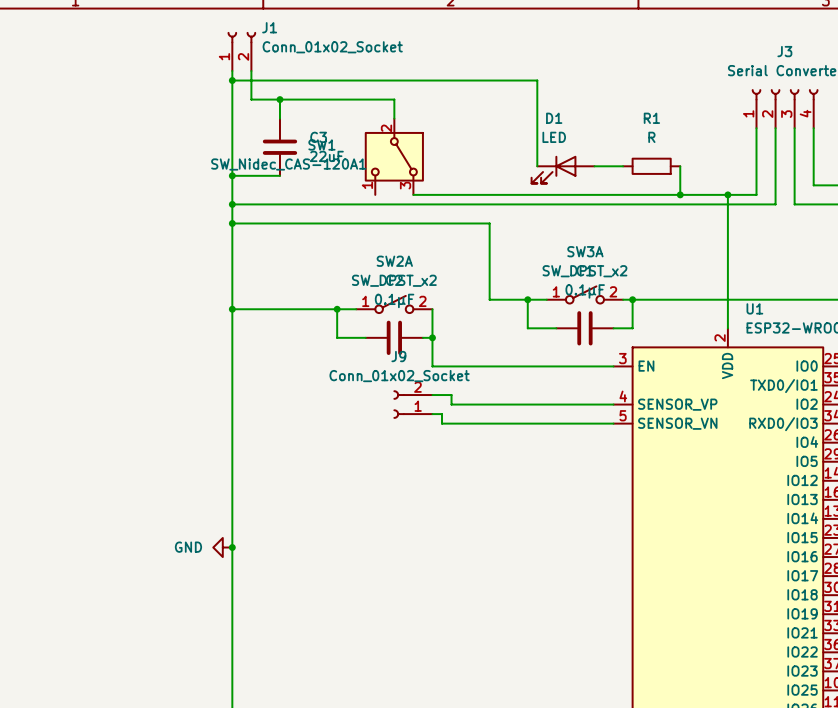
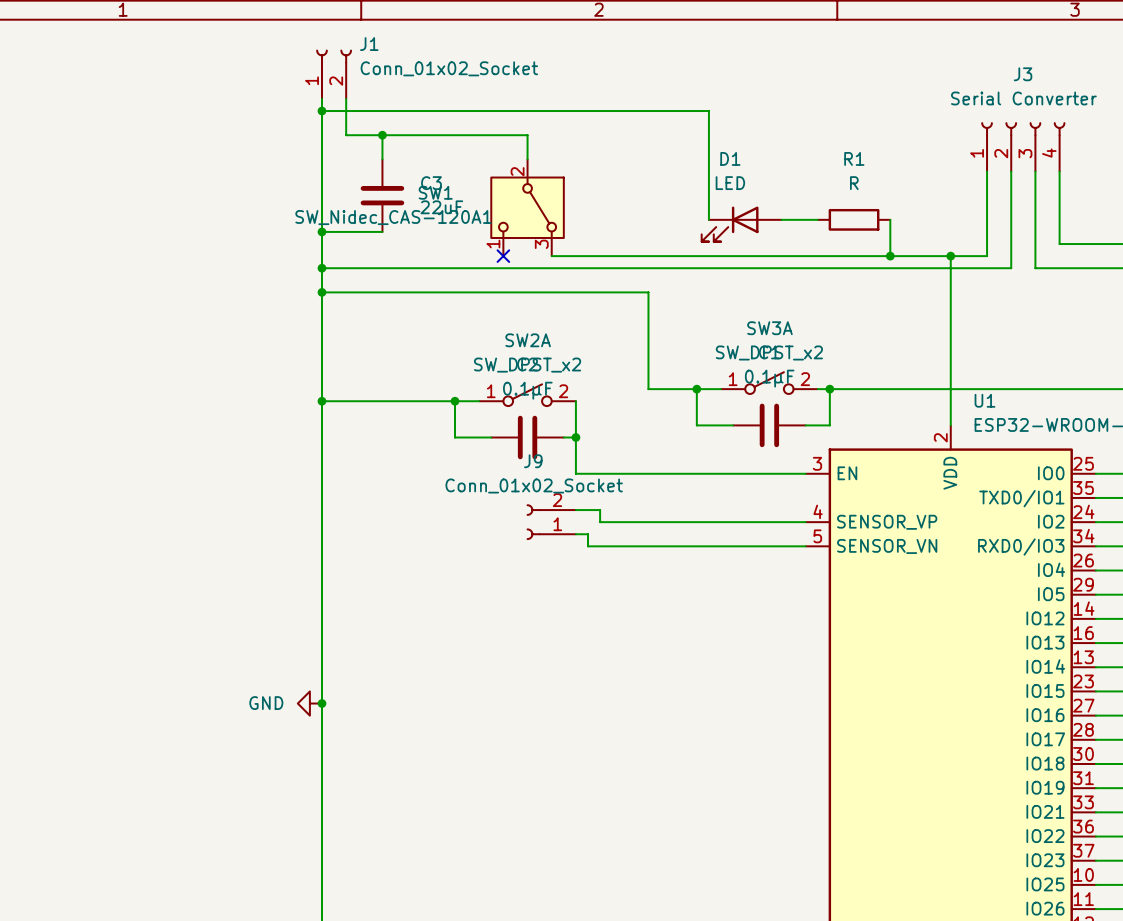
no-connect mark: none -> (503, 256)

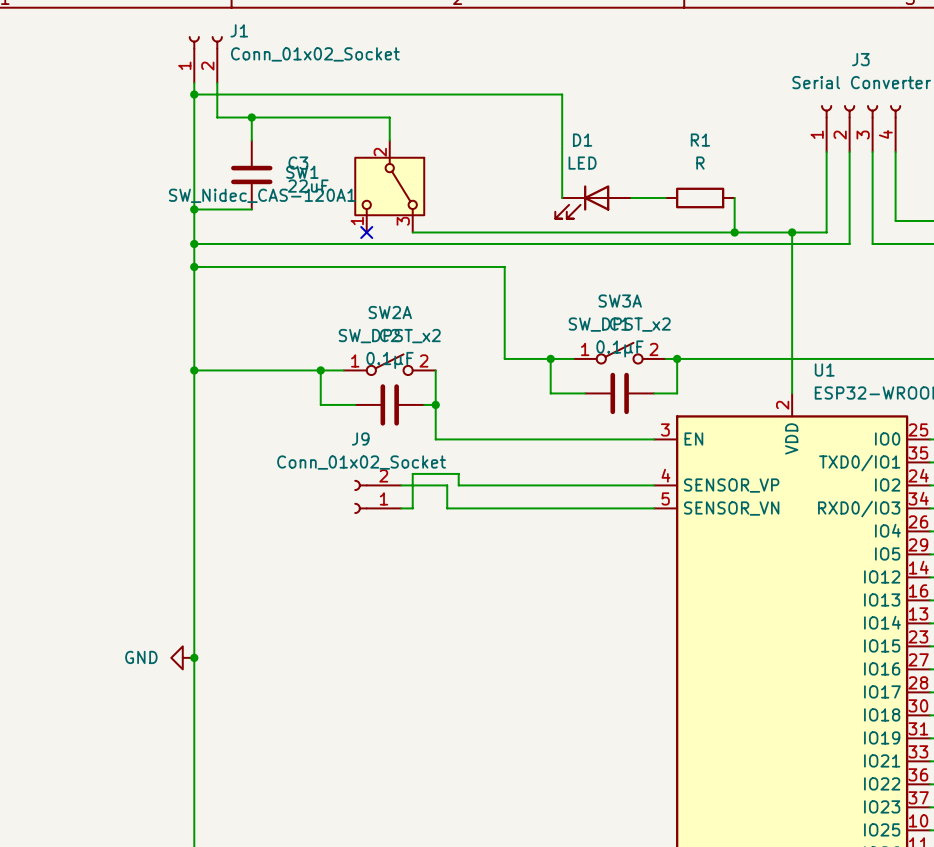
wire: none -> (435, 473) (412, 473) (412, 508) (401, 508)
J9 position: (551, 522) -> (377, 496)
wire: (575, 534) (588, 534) -> (401, 485) (447, 485) (447, 496)

